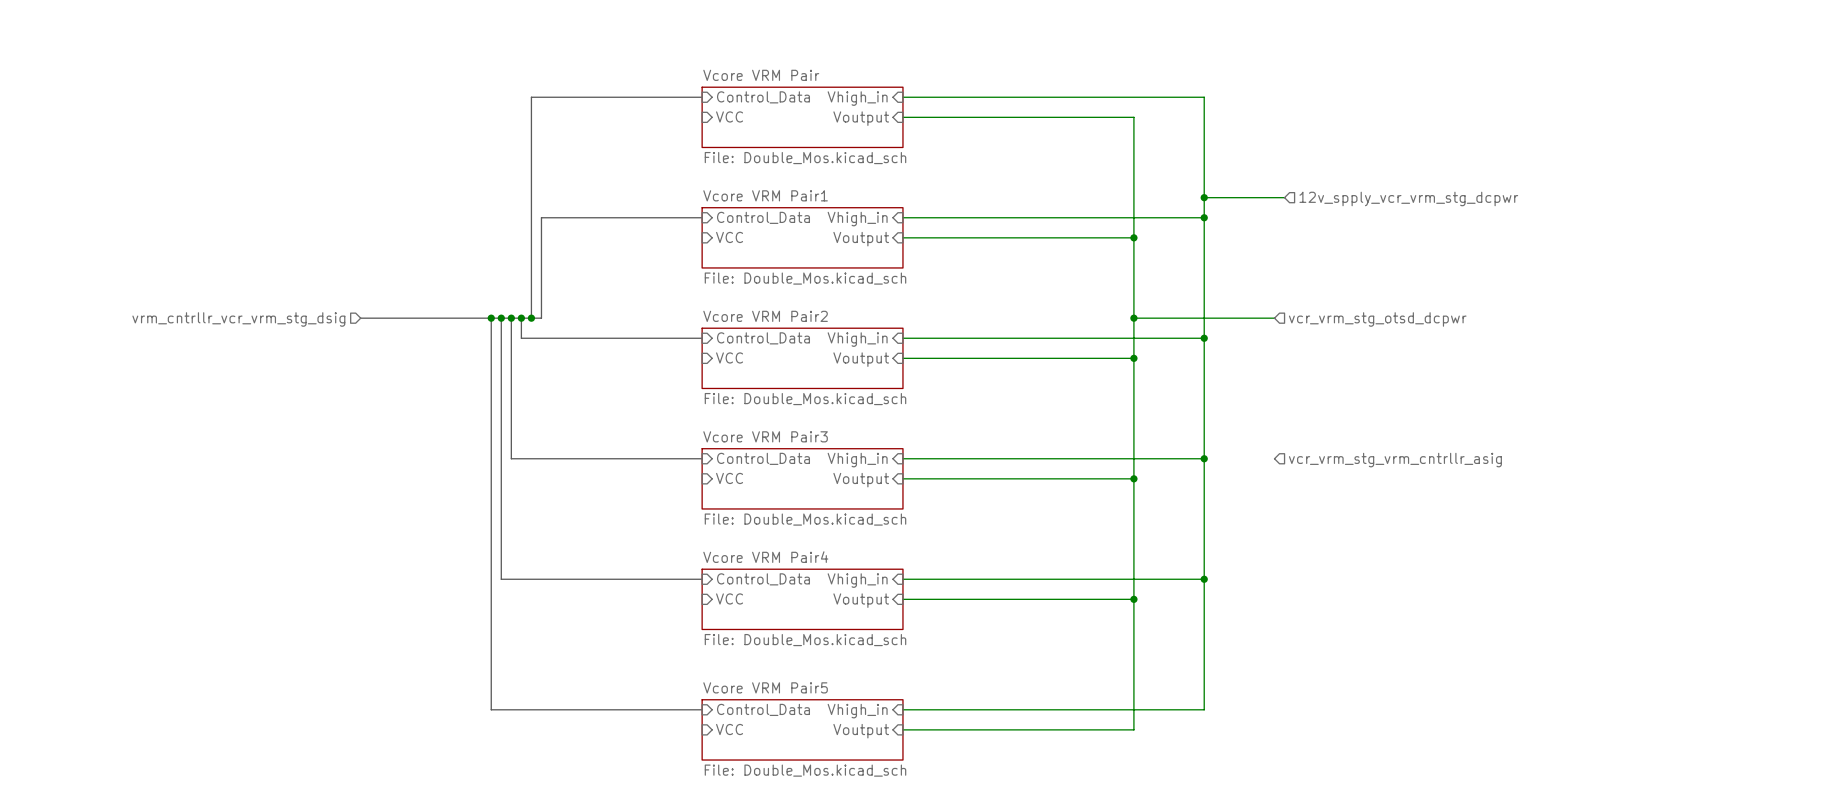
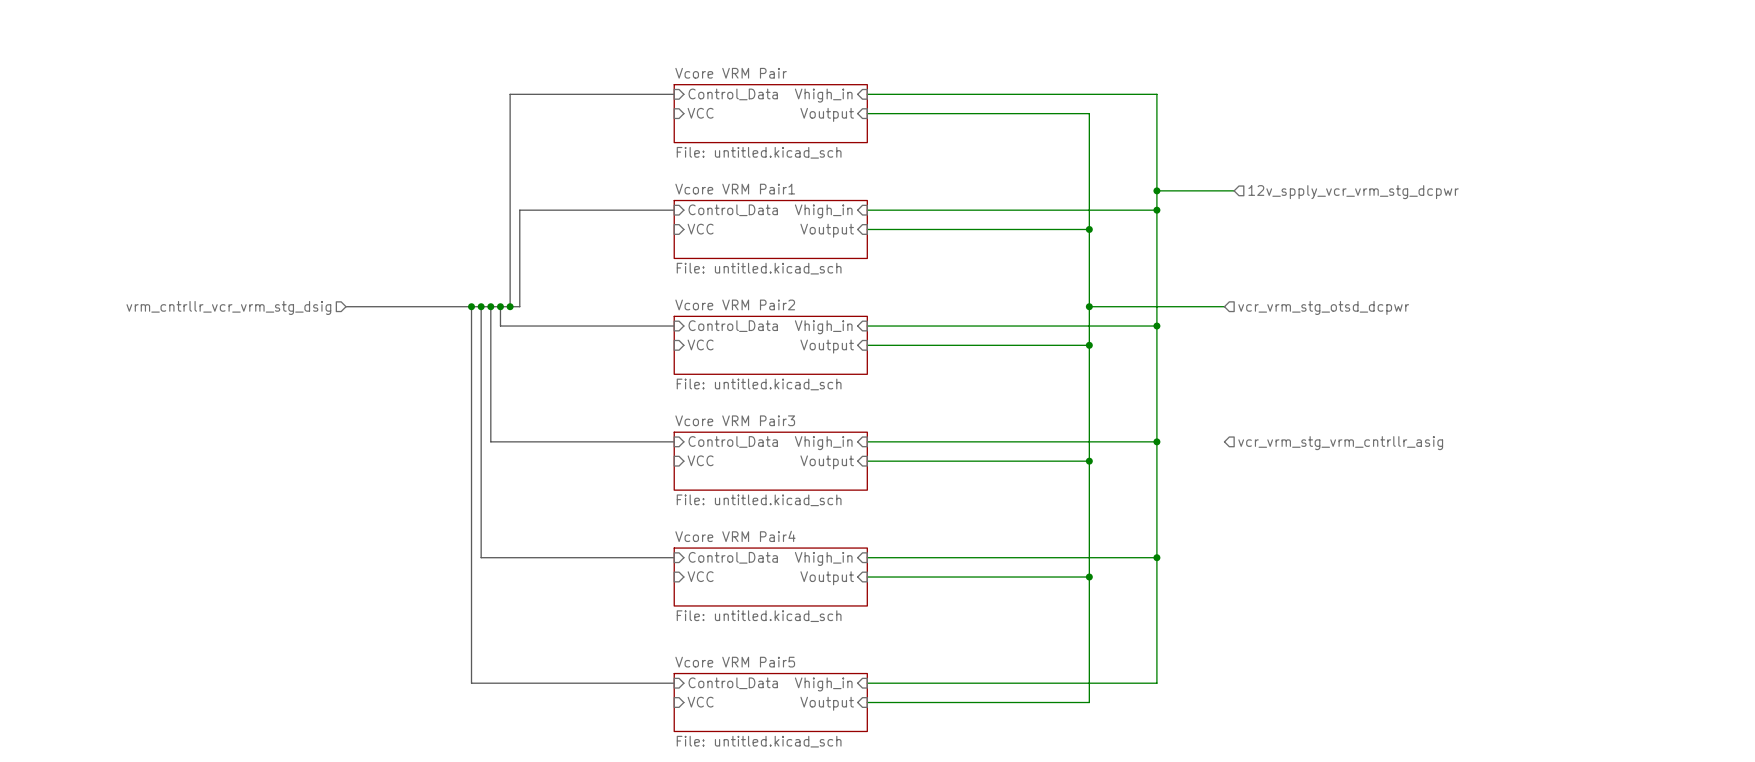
sheet Vcore VRM Pair value: File: Double_Mos.kicad_sch (805, 158) -> File: untitled.kicad_sch (759, 152)
sheet Vcore VRM Pair1 value: File: Double_Mos.kicad_sch (805, 278) -> File: untitled.kicad_sch (759, 268)
sheet Vcore VRM Pair2 value: File: Double_Mos.kicad_sch (805, 399) -> File: untitled.kicad_sch (759, 384)
sheet Vcore VRM Pair3 value: File: Double_Mos.kicad_sch (805, 519) -> File: untitled.kicad_sch (759, 500)
sheet Vcore VRM Pair4 value: File: Double_Mos.kicad_sch (805, 640) -> File: untitled.kicad_sch (759, 616)
sheet Vcore VRM Pair5 value: File: Double_Mos.kicad_sch (805, 770) -> File: untitled.kicad_sch (759, 741)

